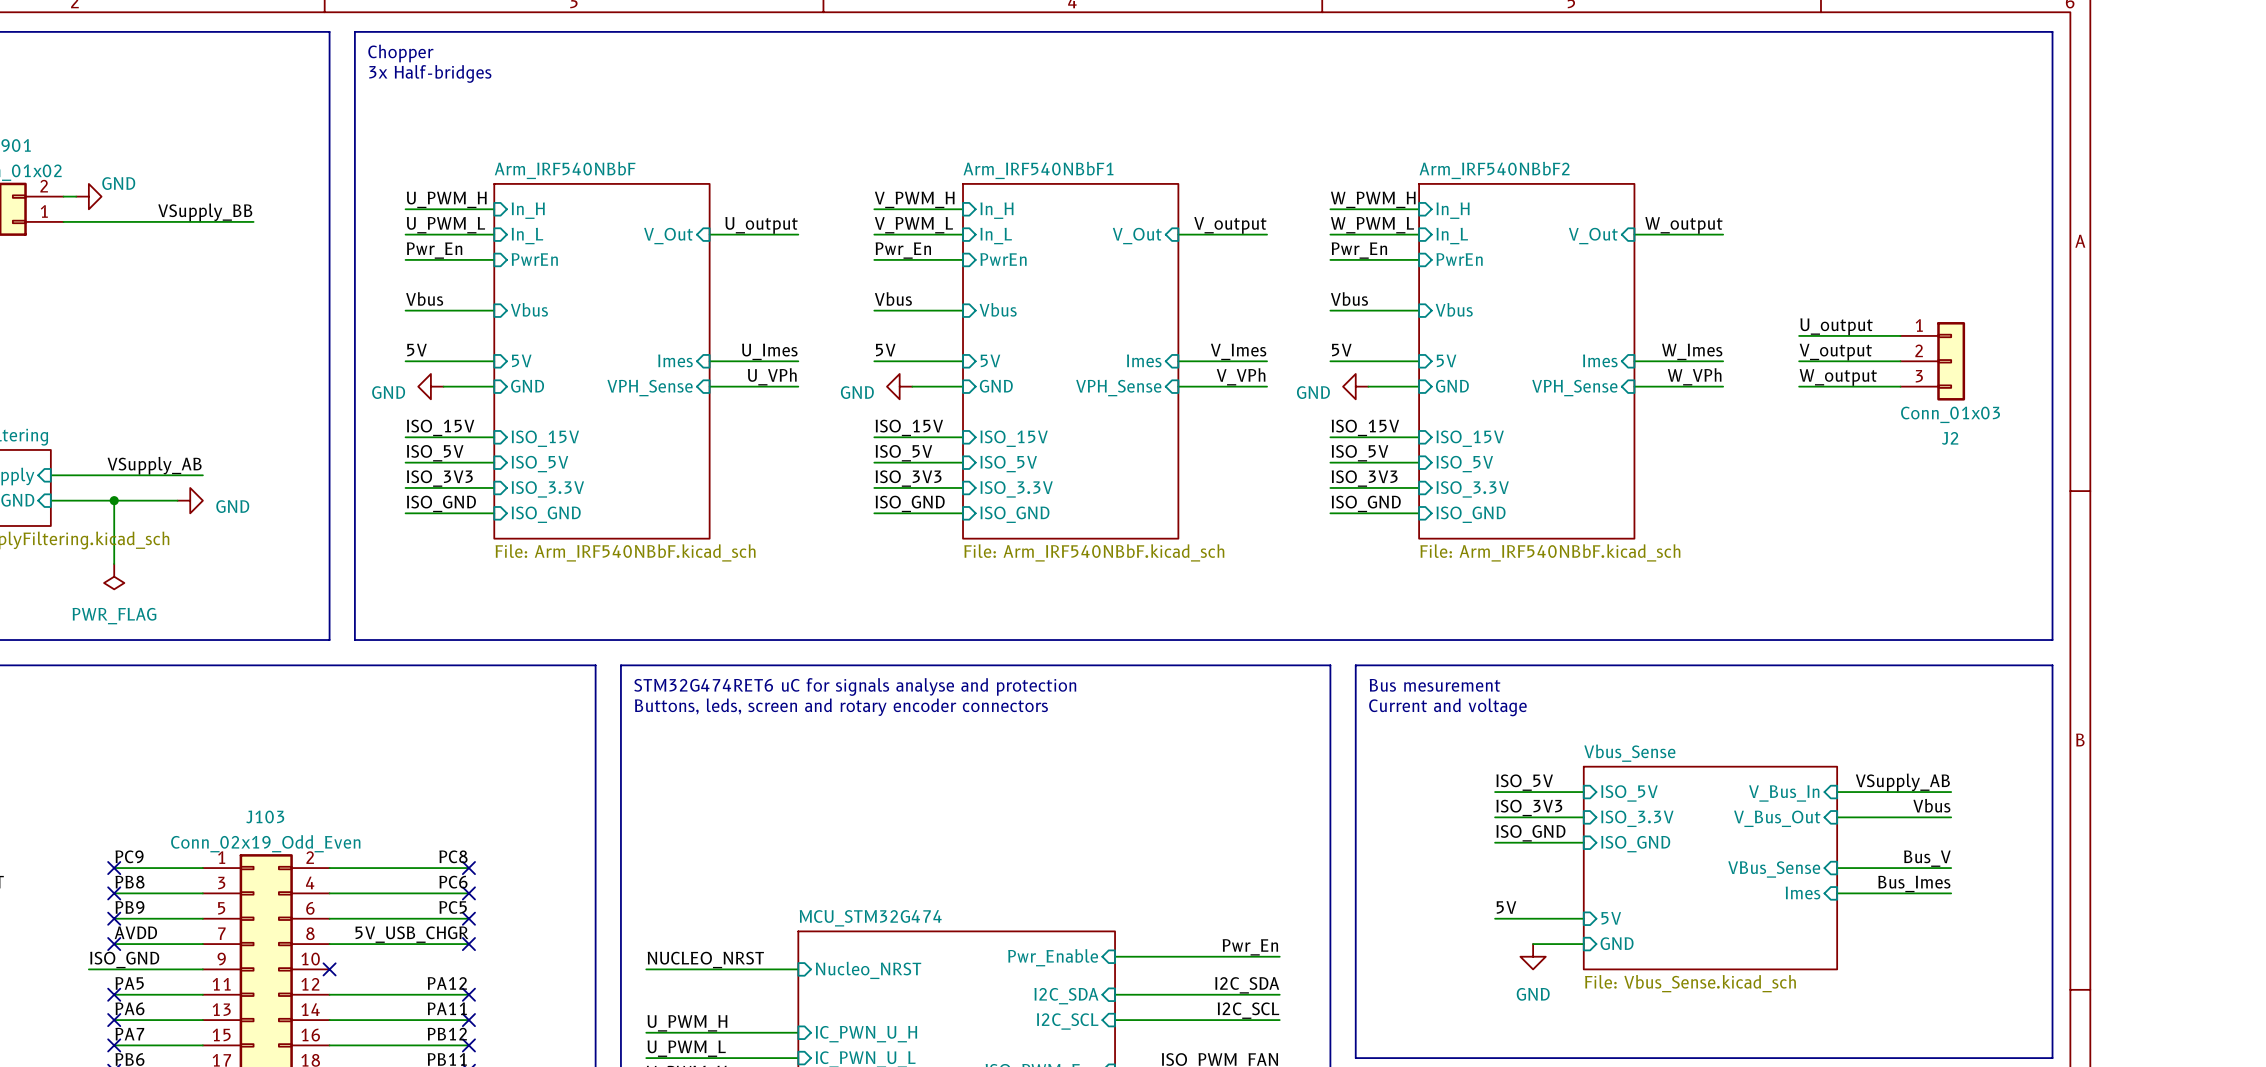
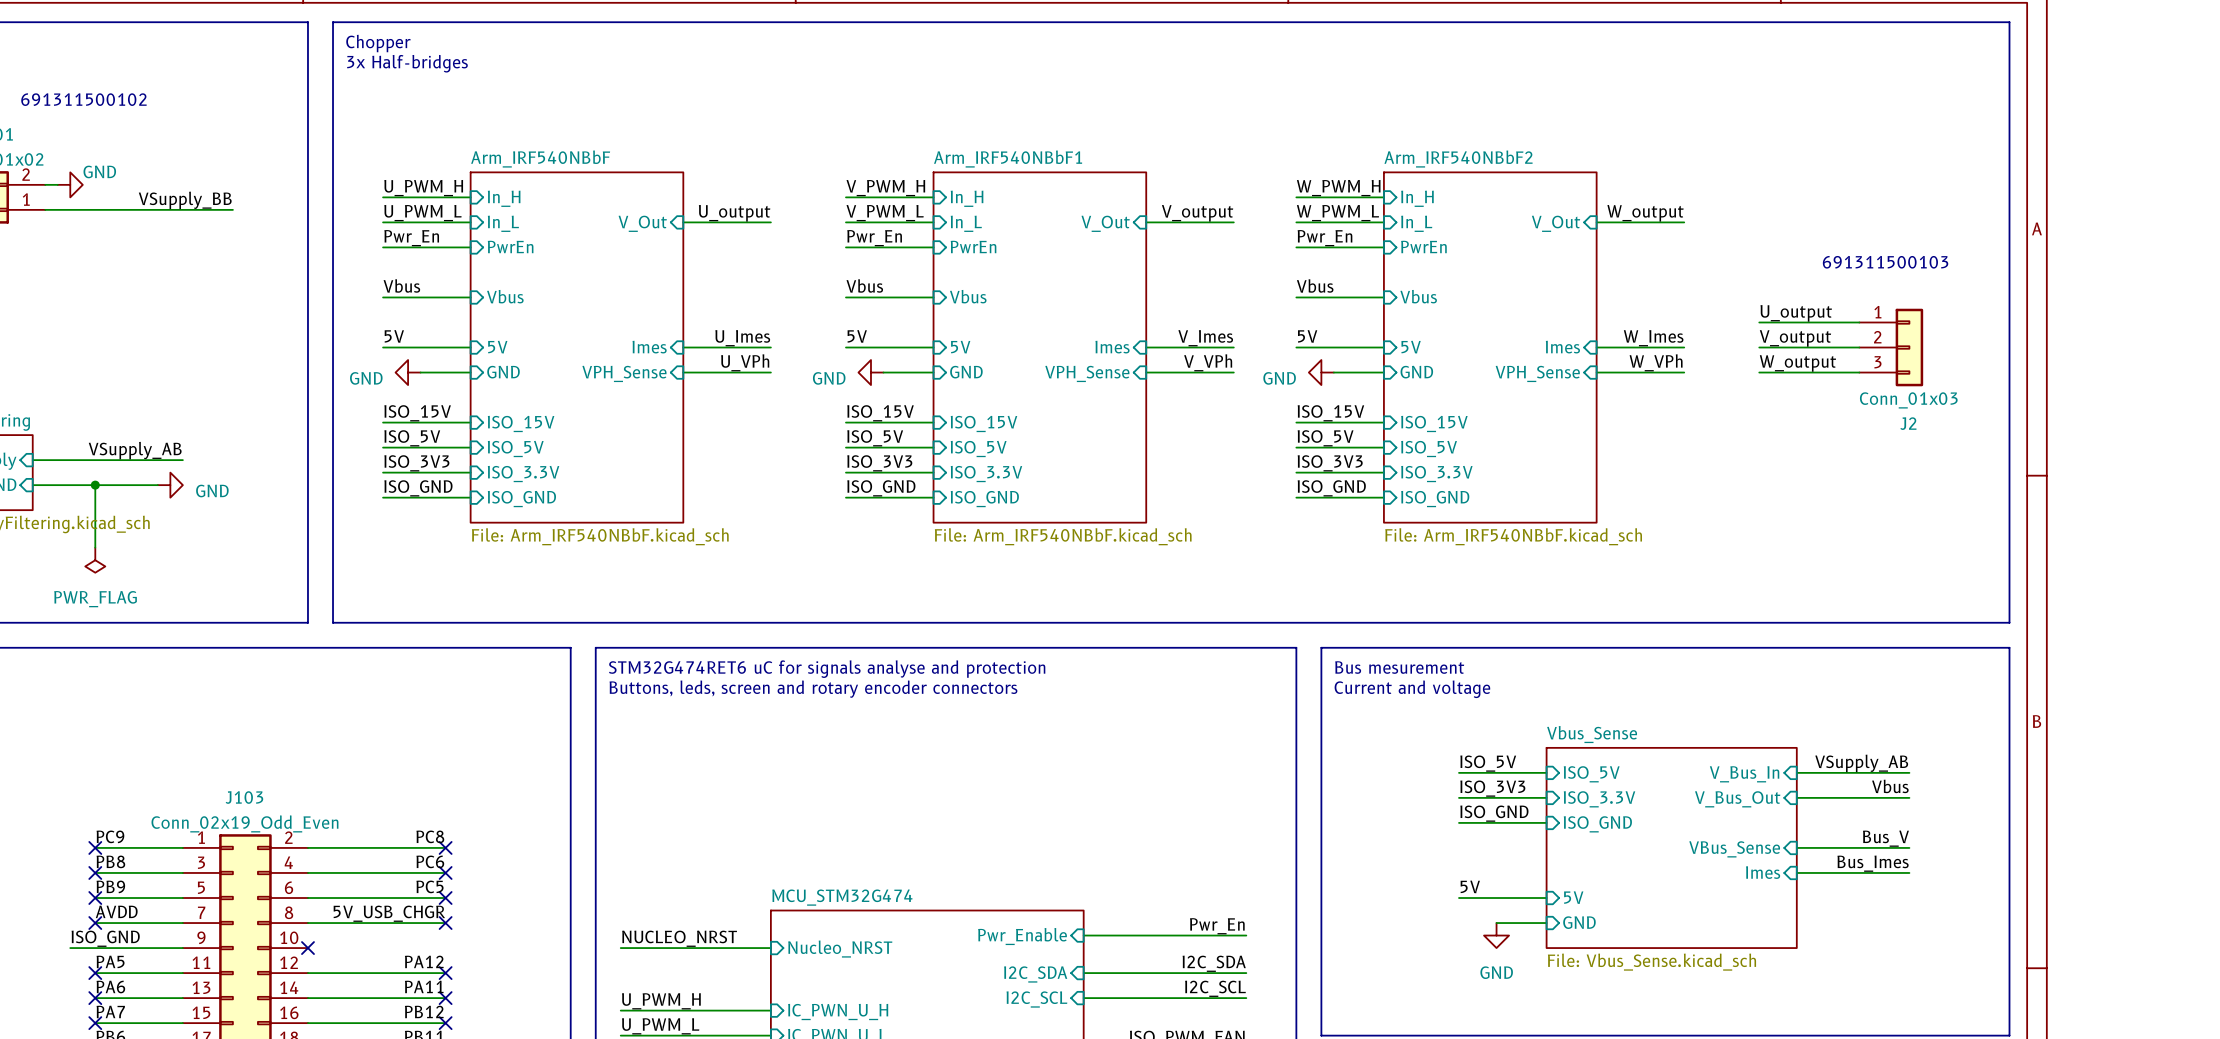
text: none -> 691311500102 (83, 99)
text: none -> 691311500103 (1885, 262)

